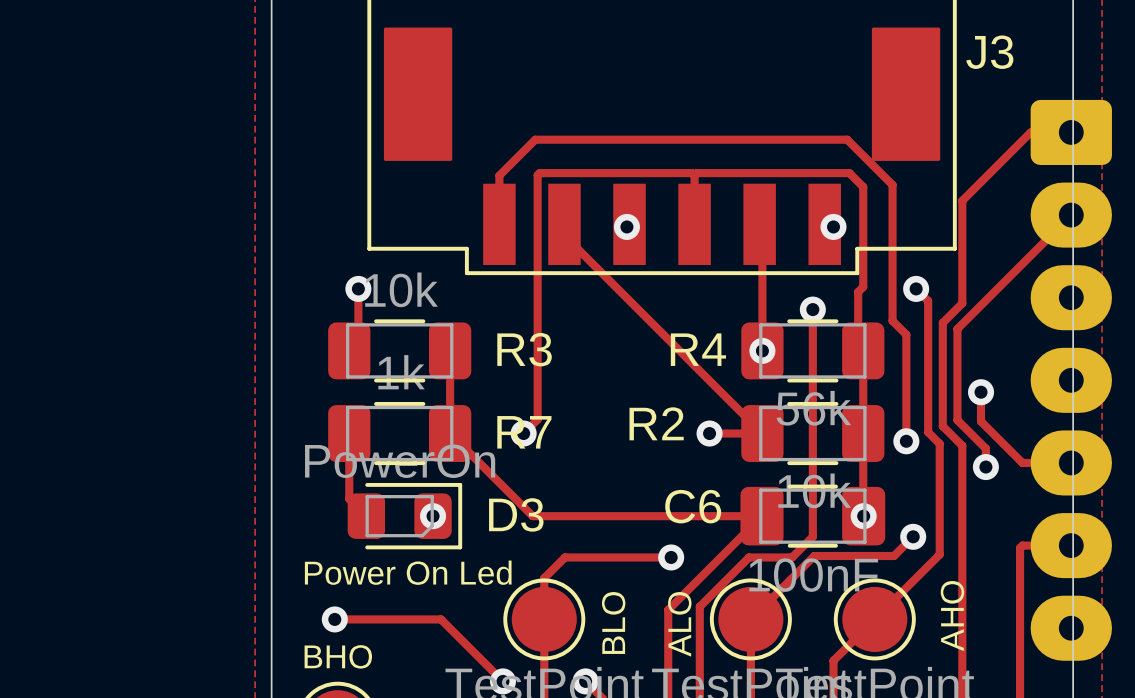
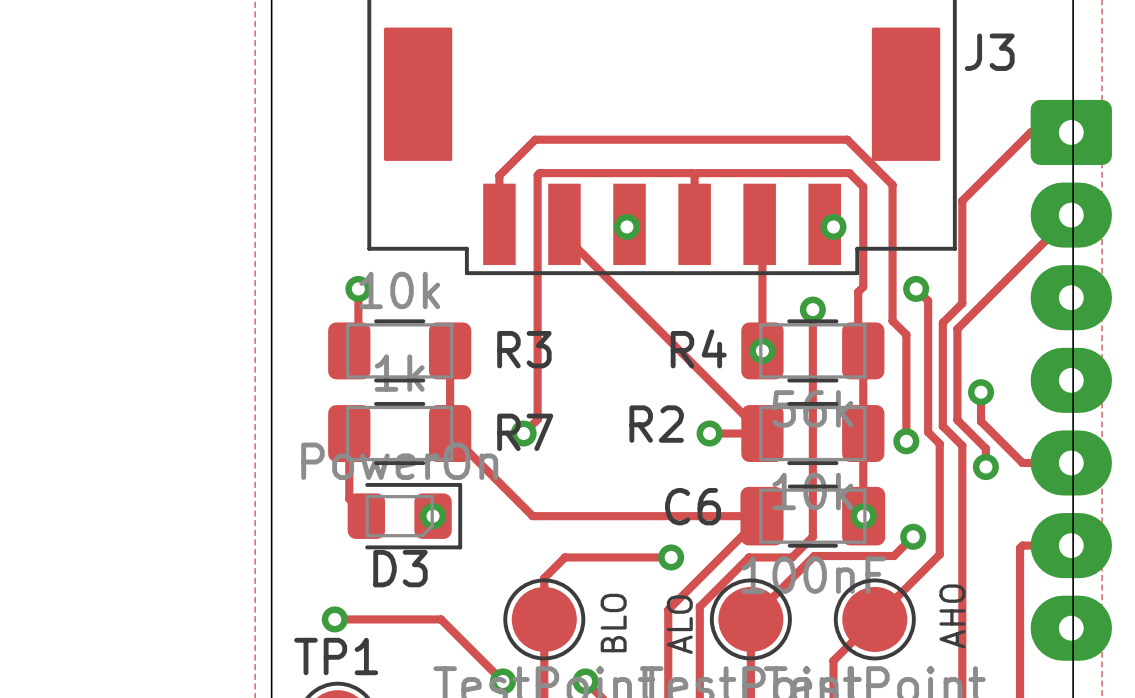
D3 name position: D3 (516, 514) -> D3 (400, 568)
text: Power On Led (408, 572) -> none
BHO name: BHO (338, 656) -> TP1 (336, 656)

